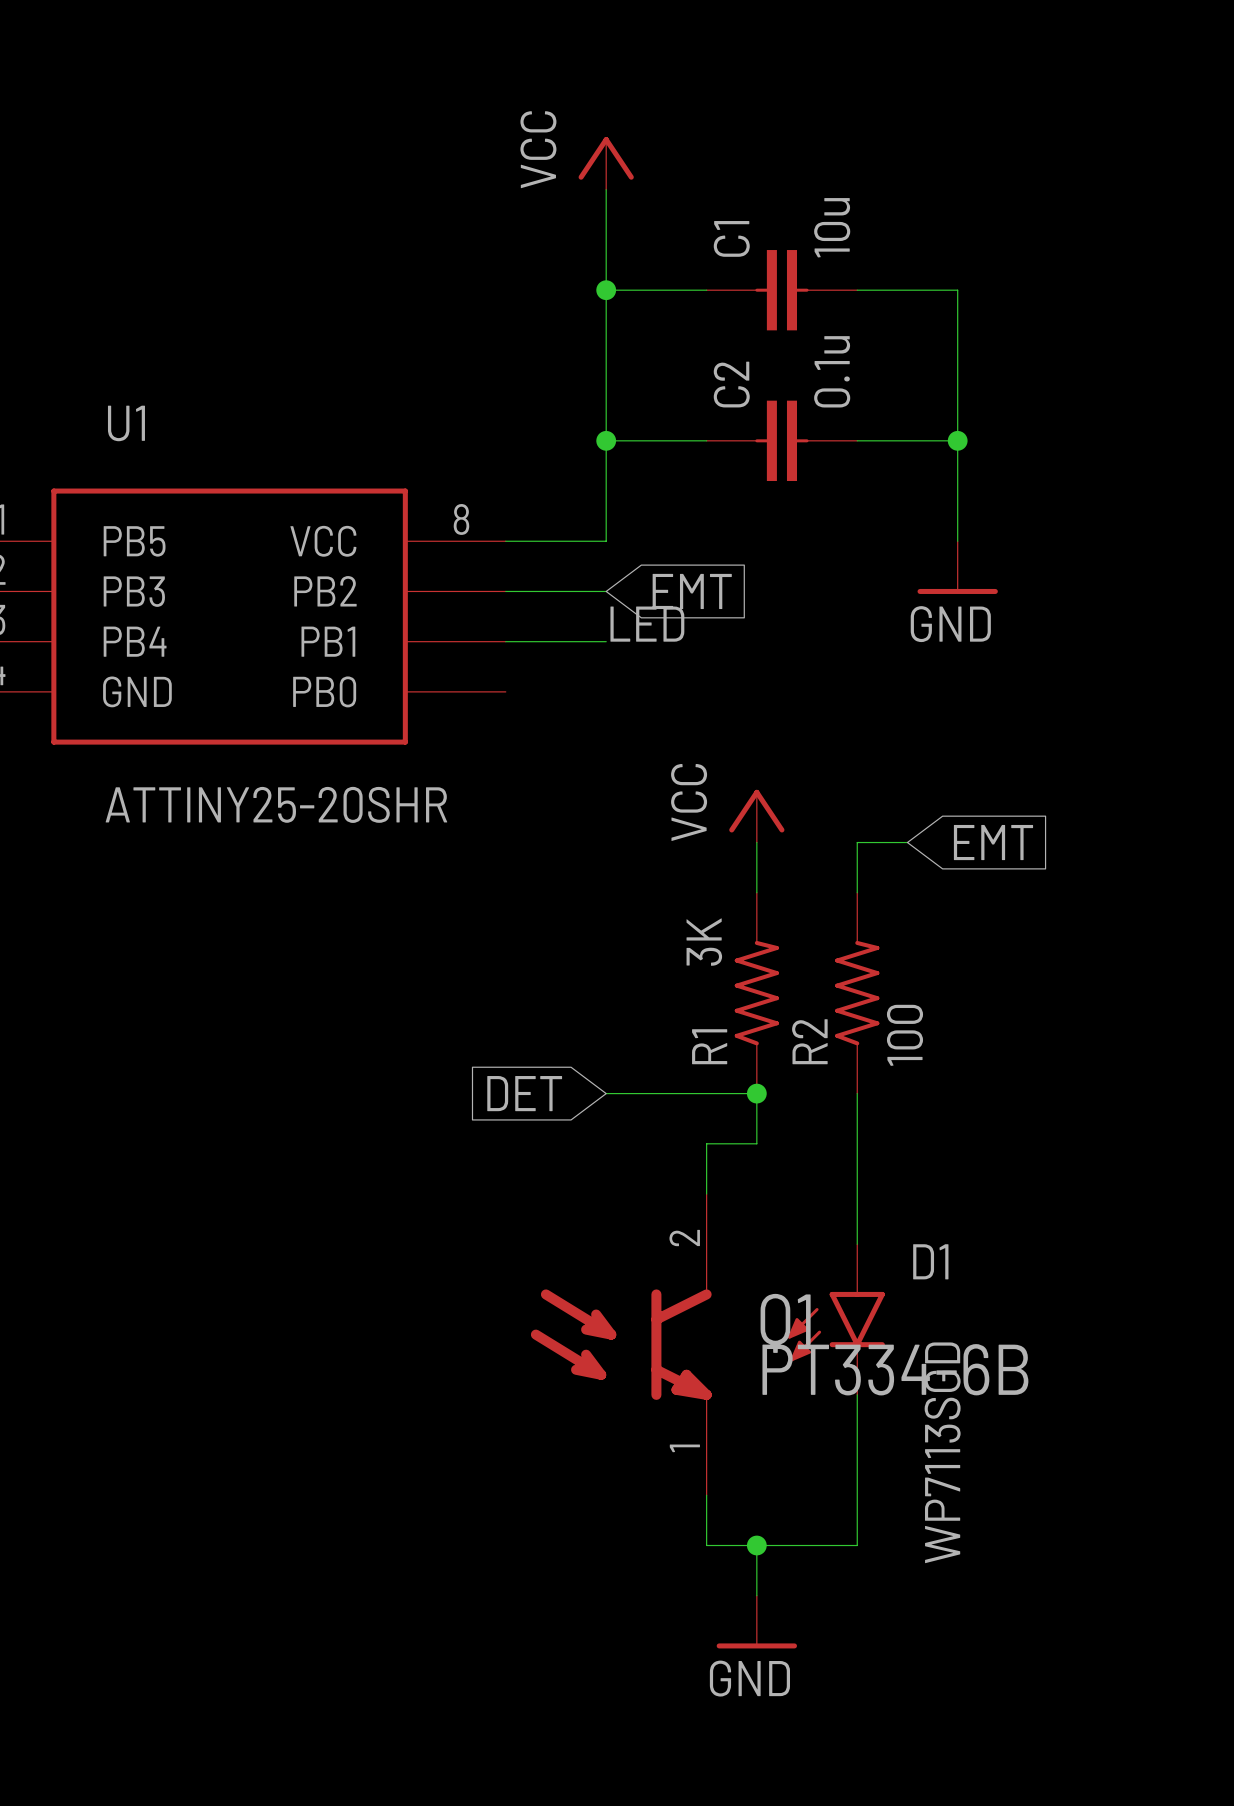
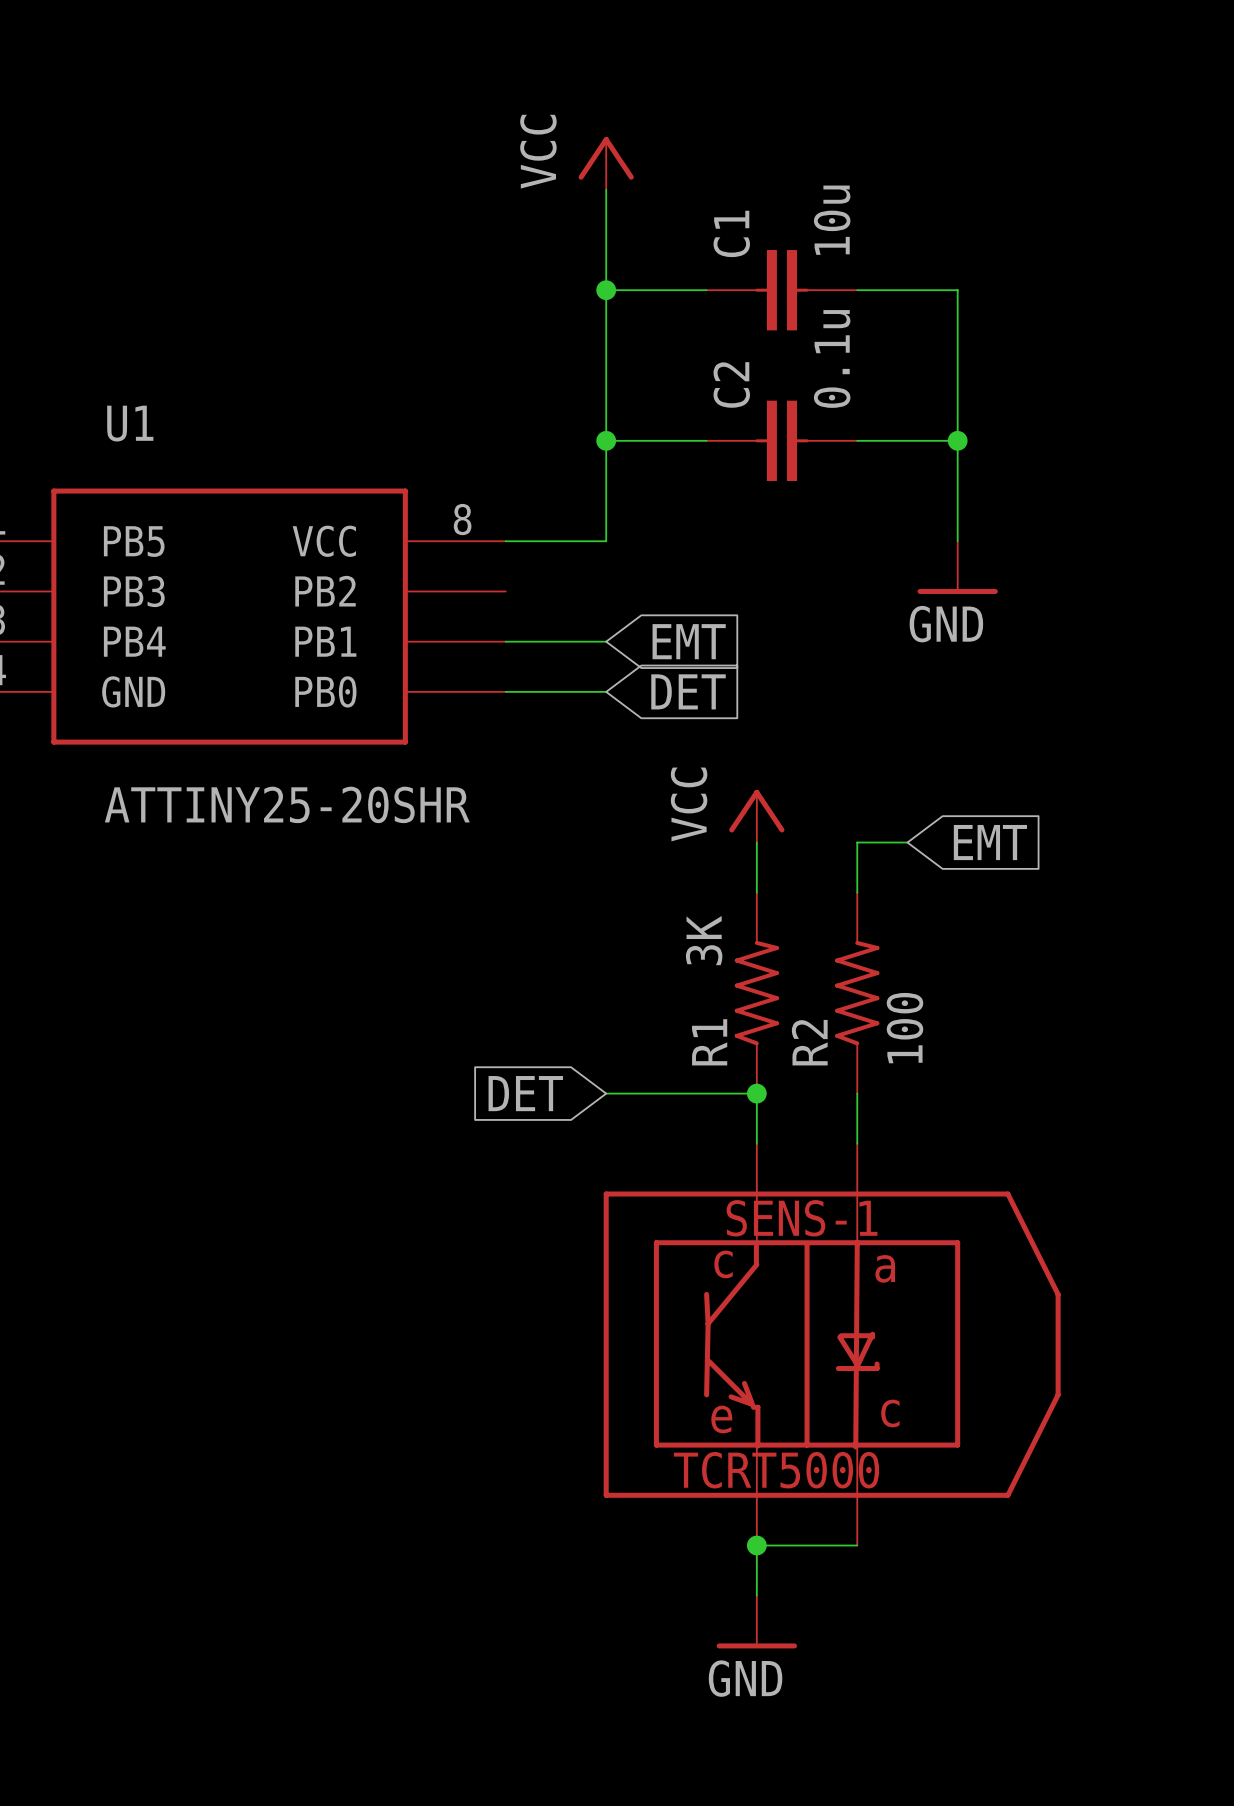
wire: (505, 591) (606, 591) -> (505, 691) (606, 691)
global label position: EMT (692, 591) -> EMT (689, 641)
label: LED (647, 624) -> none
global label: none -> DET (688, 691)
wire: (756, 1143) (706, 1143) (706, 1194) -> none
D1: WP7113SGD (836, 1319) -> none
Q1: (621, 1344) -> none
SENS-1: none -> (832, 1344)
wire: (706, 1495) (706, 1545) (756, 1545) -> none

